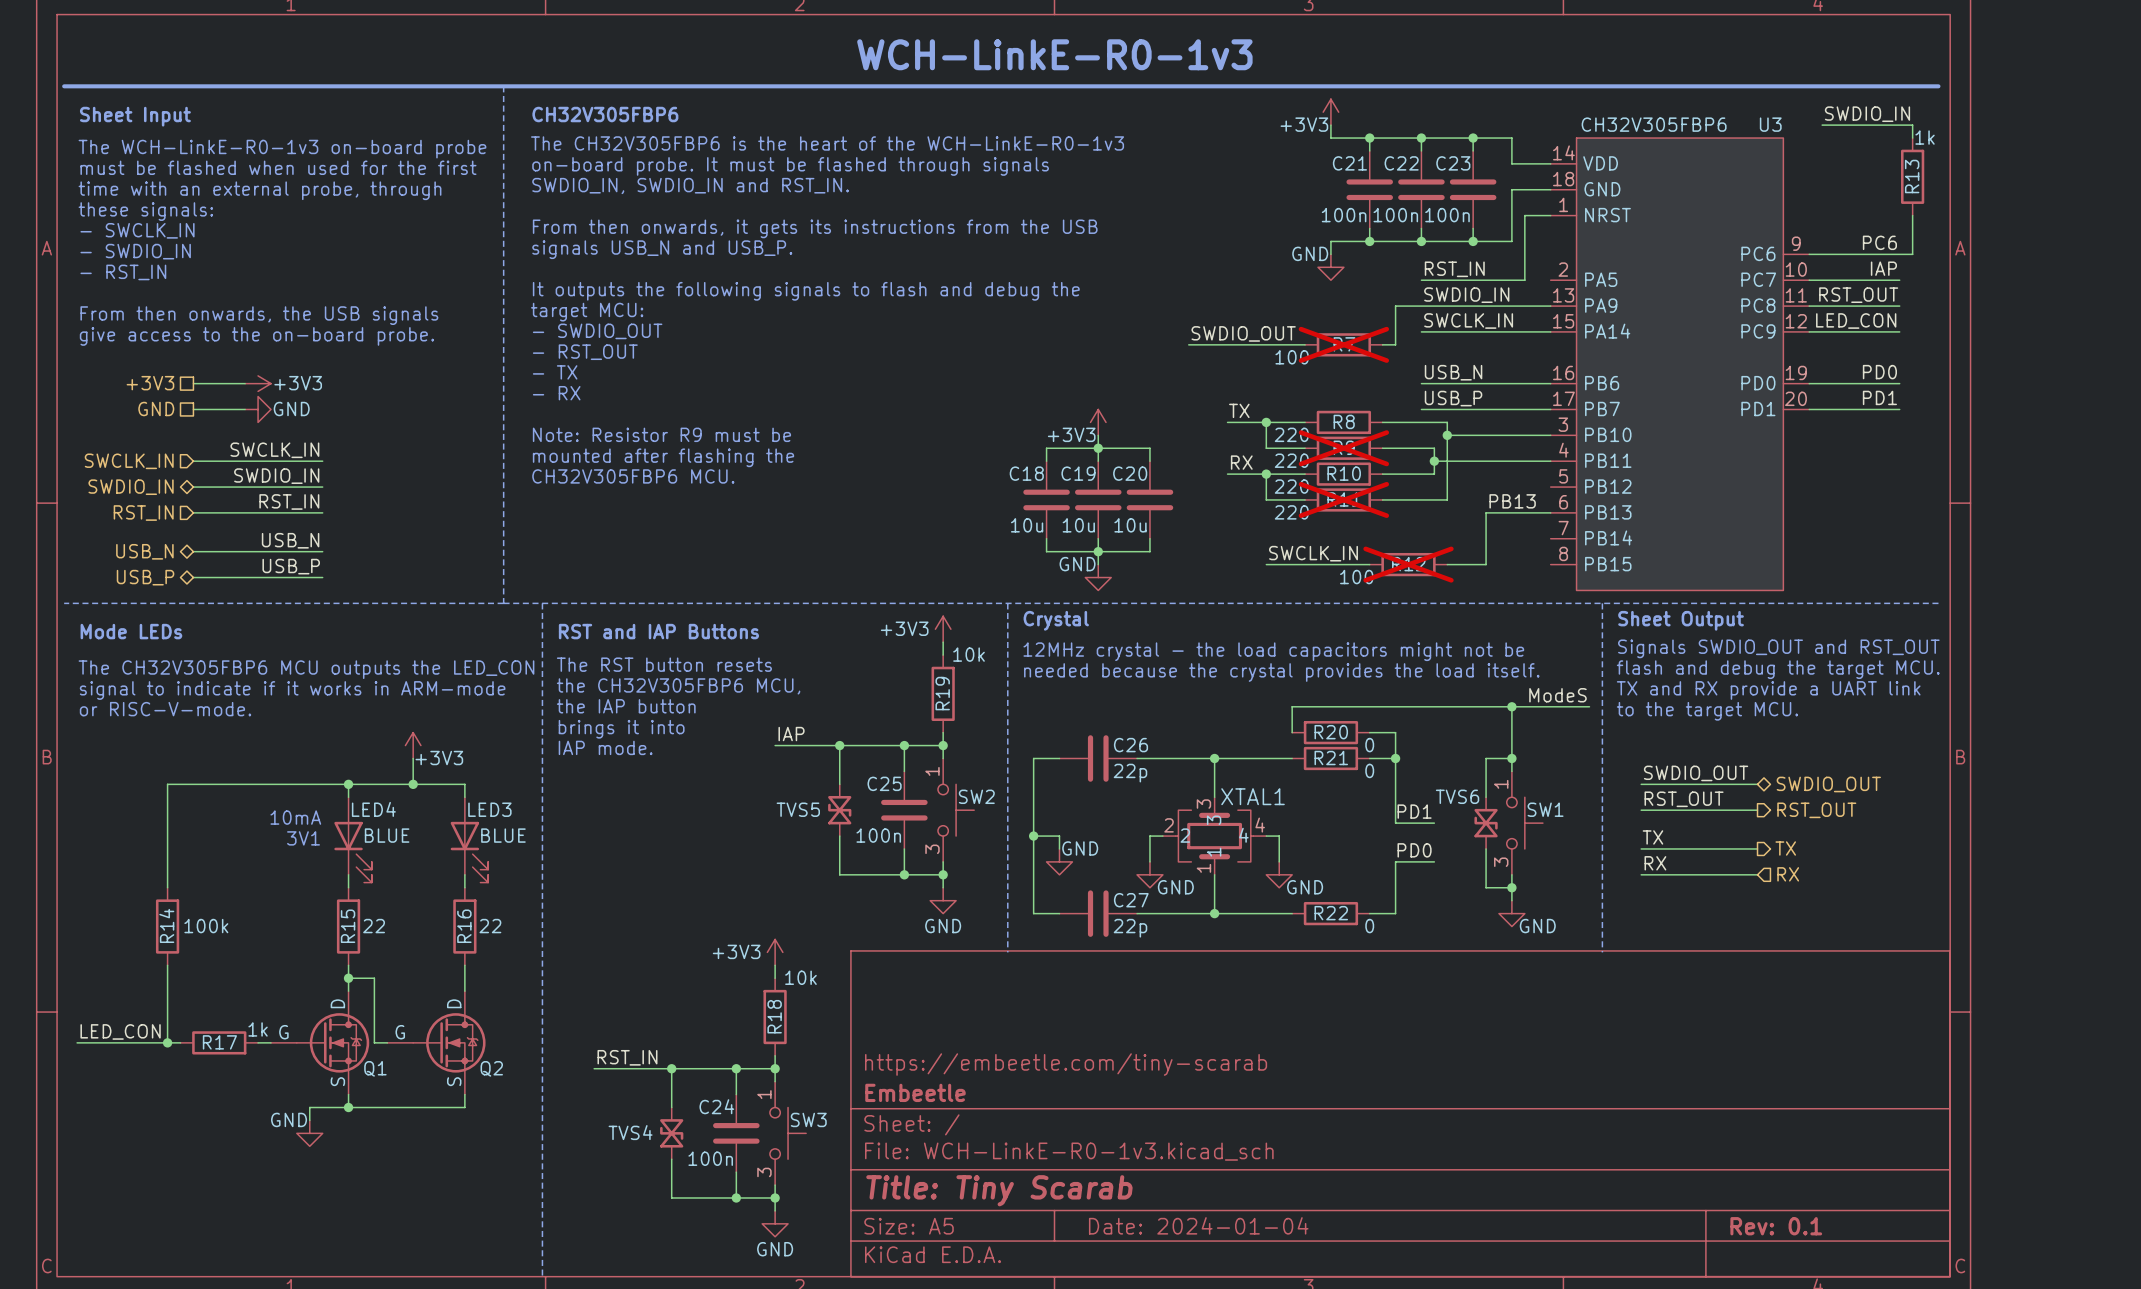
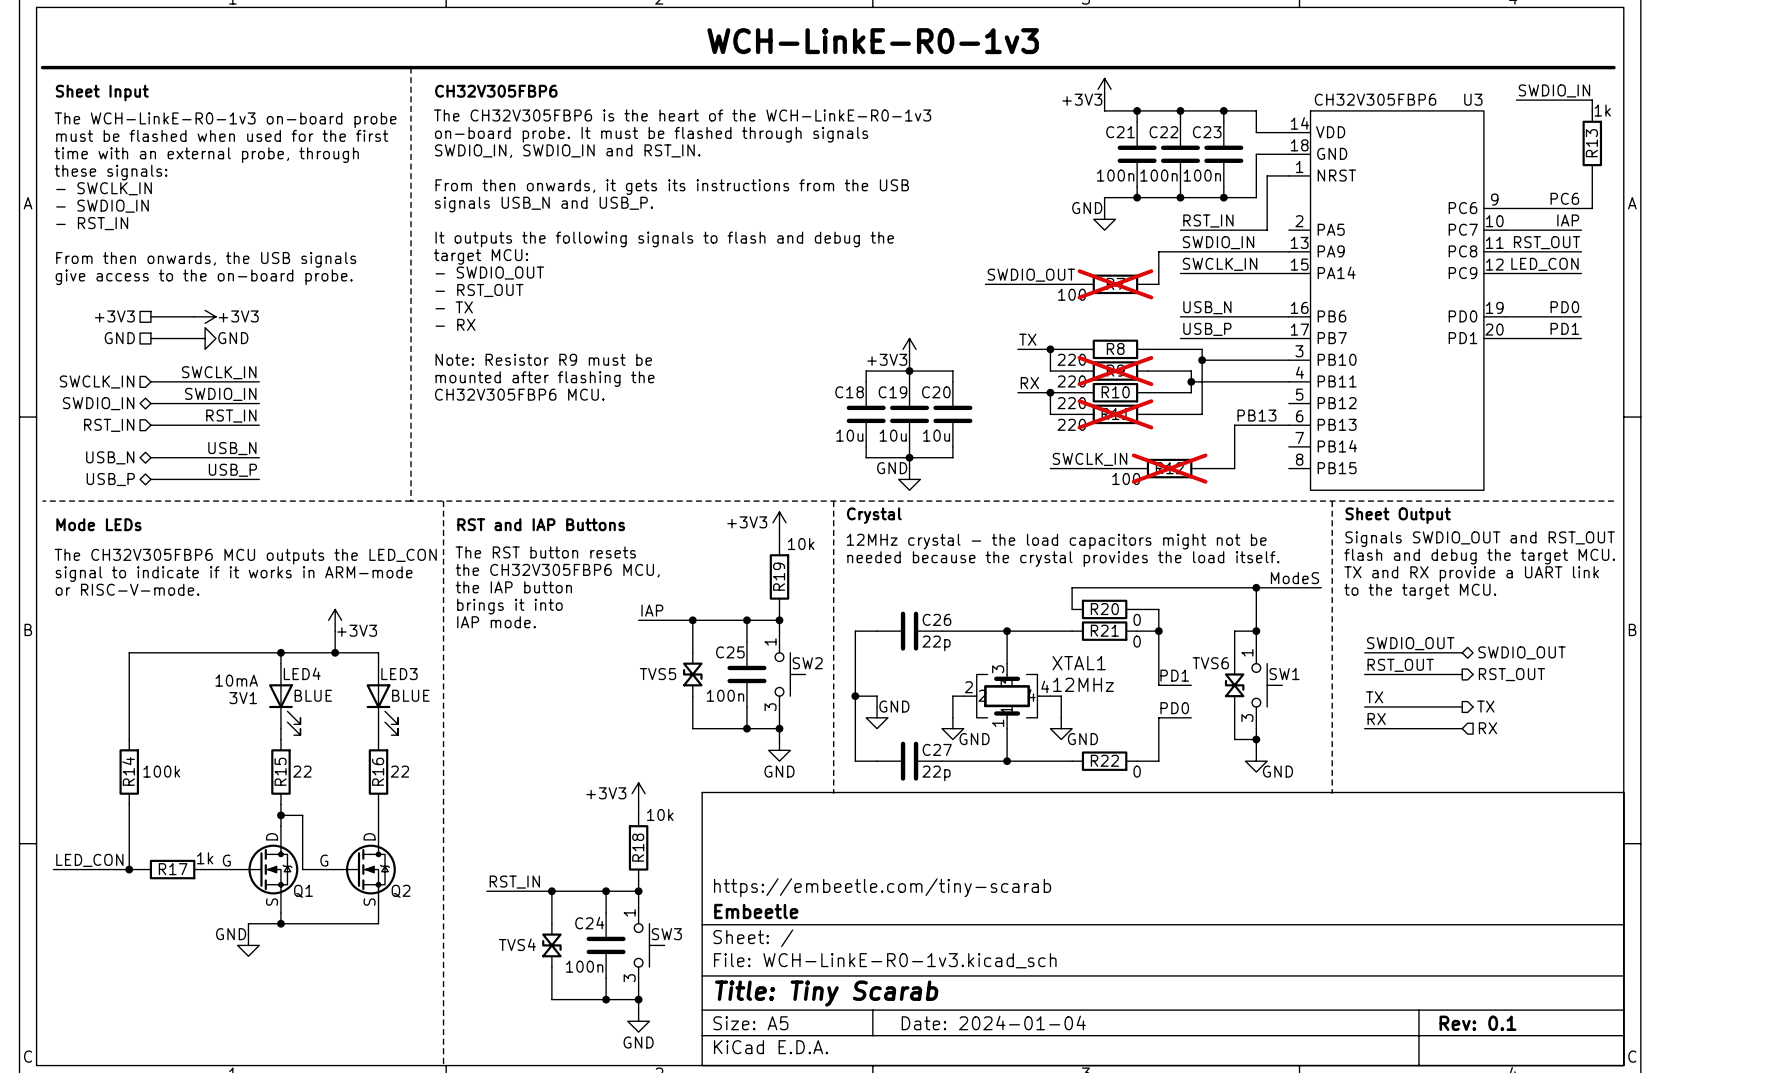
XTAL1 name position: XTAL1 (1253, 796) -> XTAL1 (1079, 663)
XTAL1 value: none -> 12MHz (1083, 684)

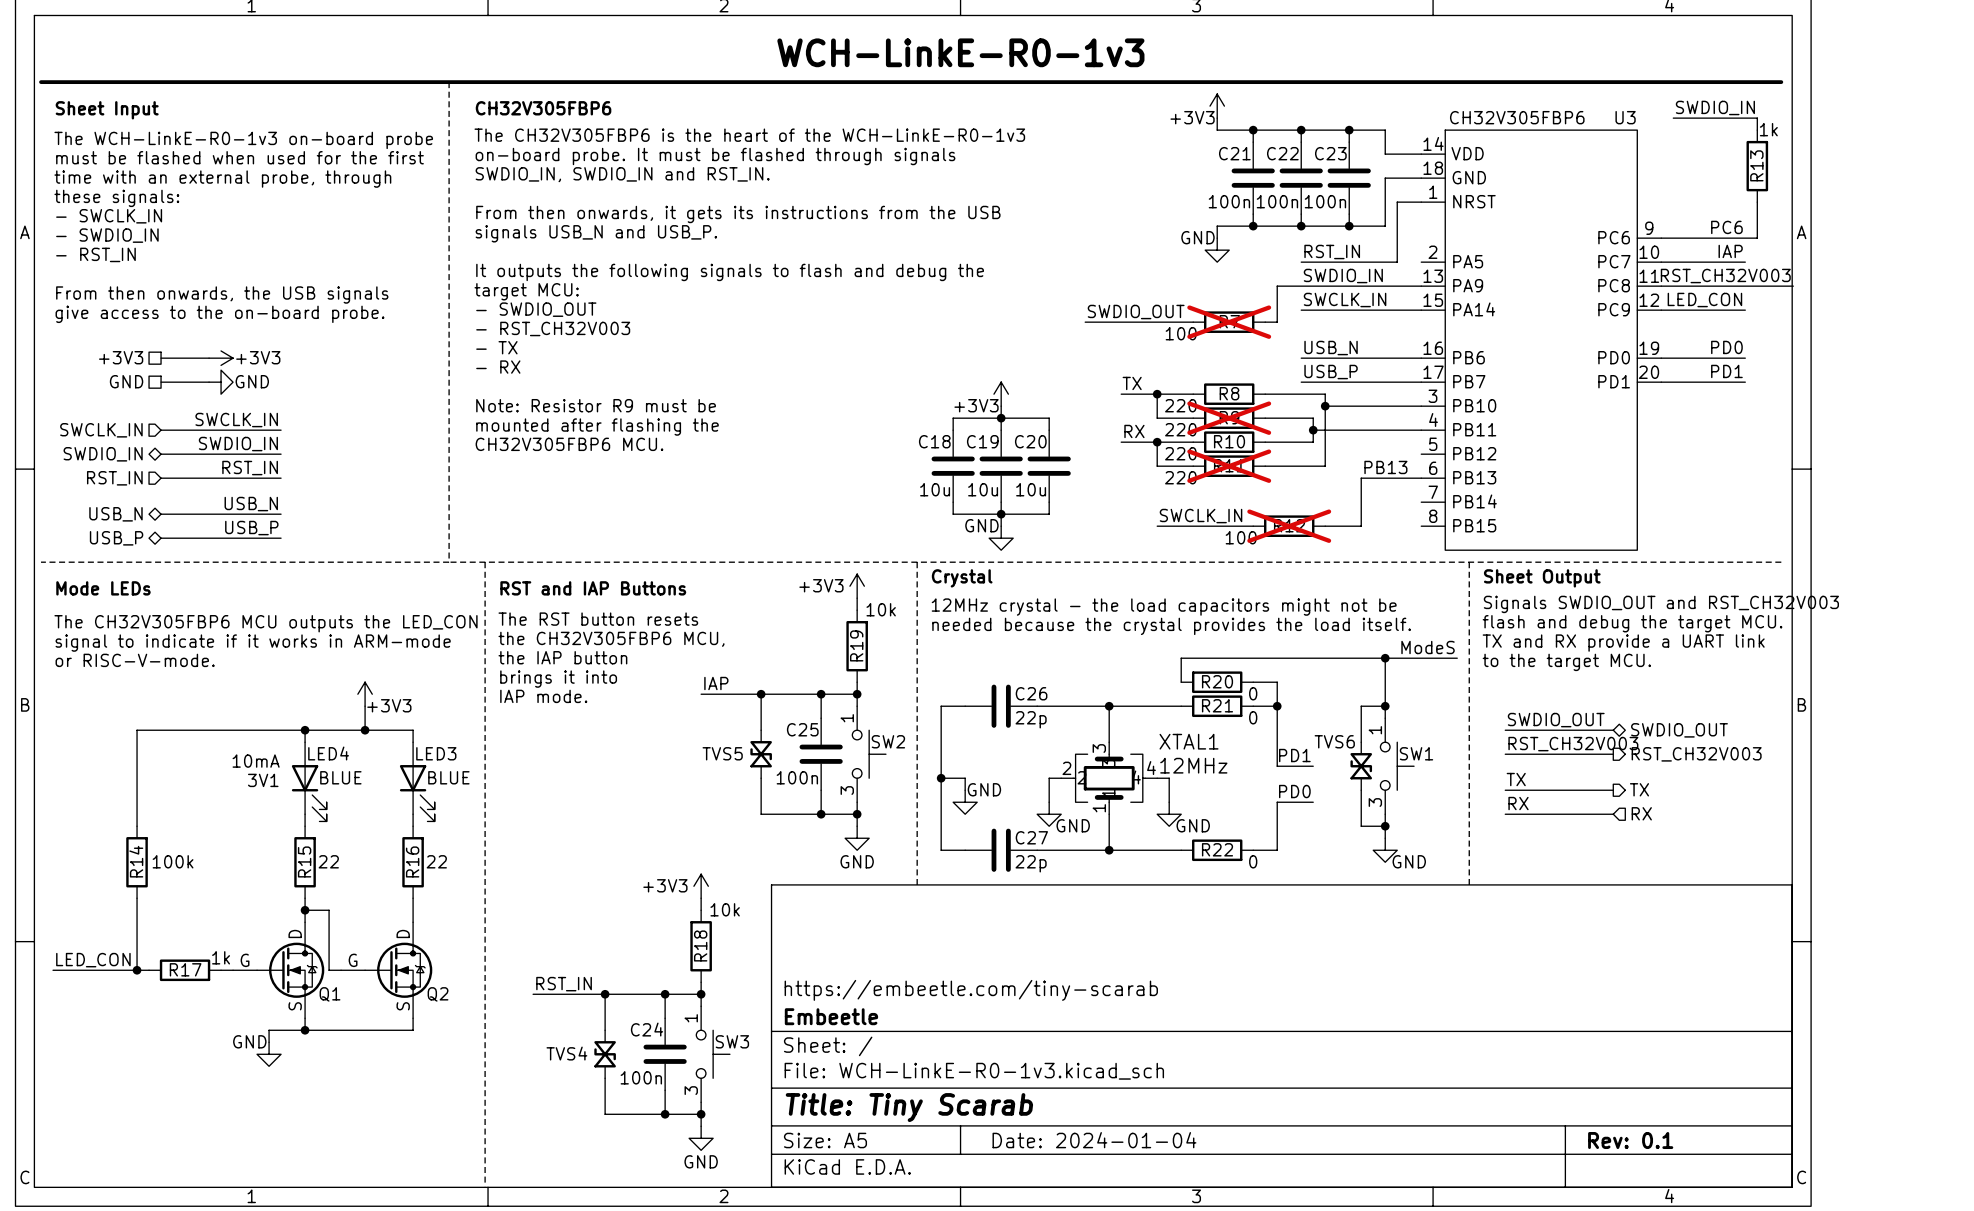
label: RST_OUT (1547, 242) -> none
label: none -> RST_CH32V003 (1725, 276)
wire: none -> (1745, 286) (1793, 286)
text: - RST_OUT (479, 290) -> - RST_CH32V003 (553, 328)
text: Signals SWDIO_OUT and RST_OUT (1480, 539) -> Signals SWDIO_OUT and RST_CH32V003 (1661, 604)
label: RST_OUT (1400, 665) -> RST_CH32V003 (1573, 744)
hierarchical label: RST_OUT (1511, 674) -> RST_CH32V003 (1696, 754)

